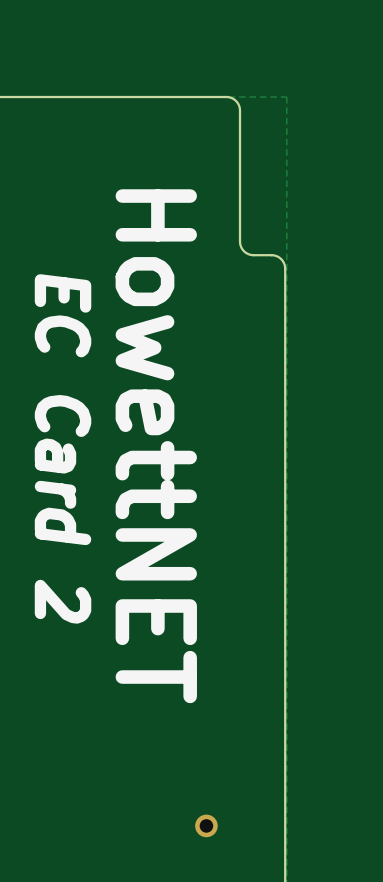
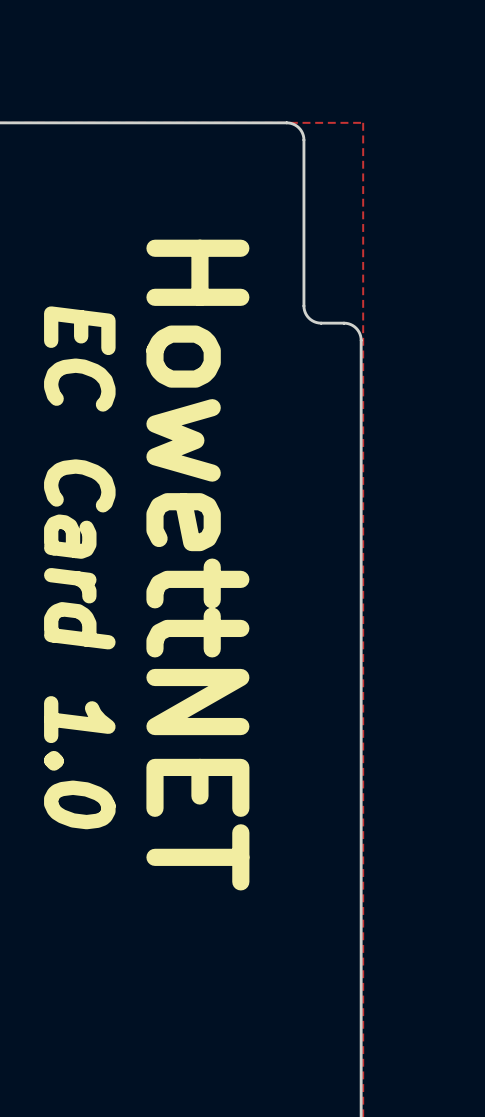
text: EC Card 2 (63, 448) -> EC Card 1.0 (79, 567)
via: (206, 825) -> none

